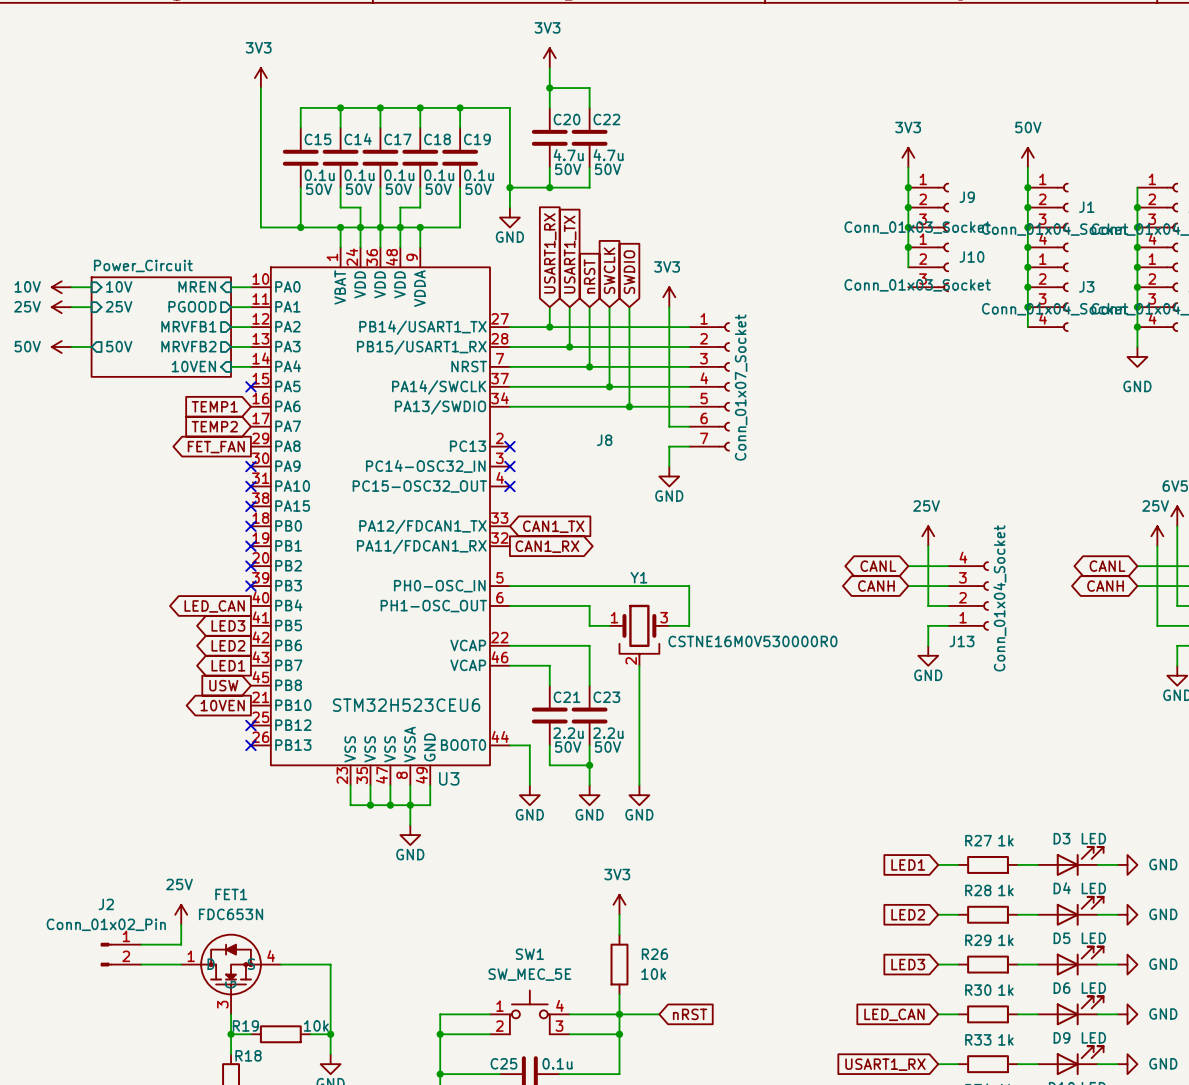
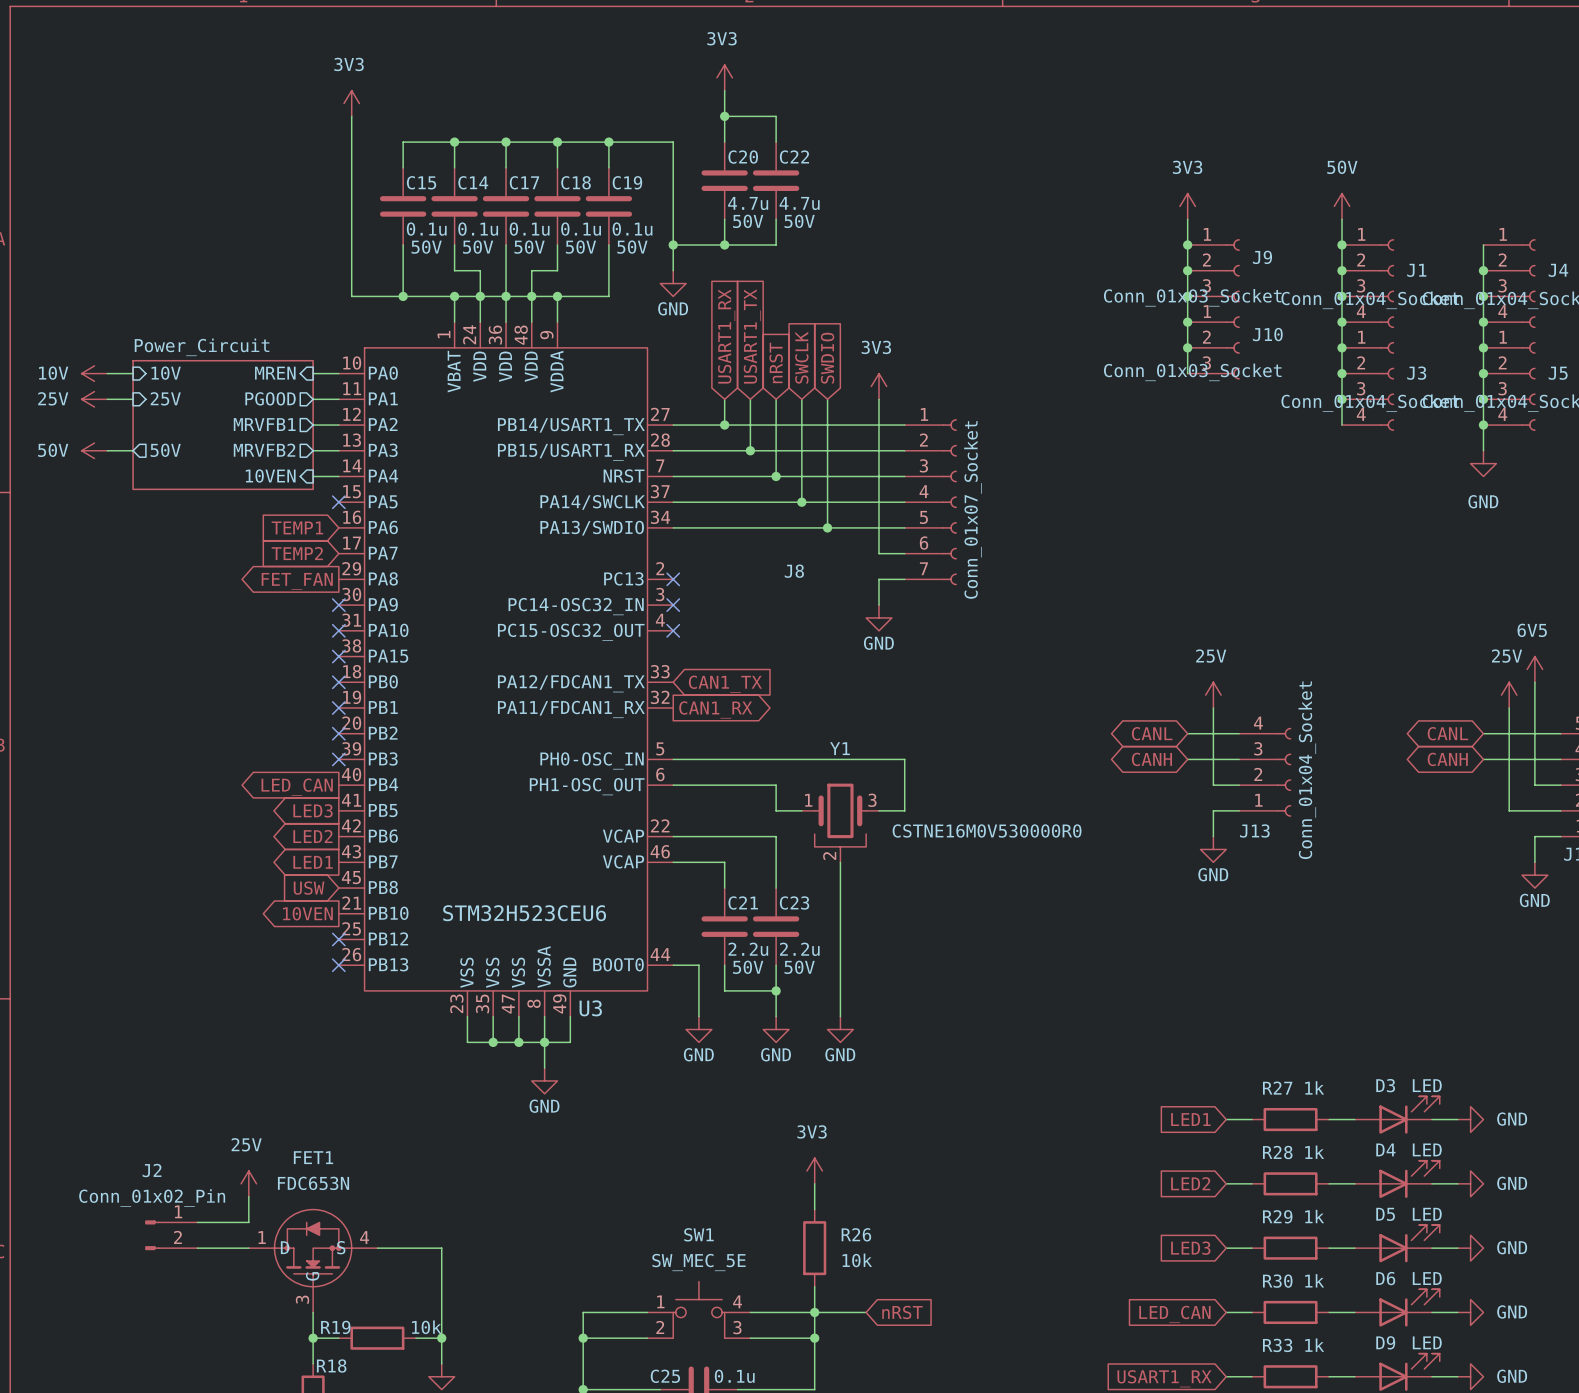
wire: none -> (1187, 347) (1187, 373)
junction: none -> (1187, 347)

